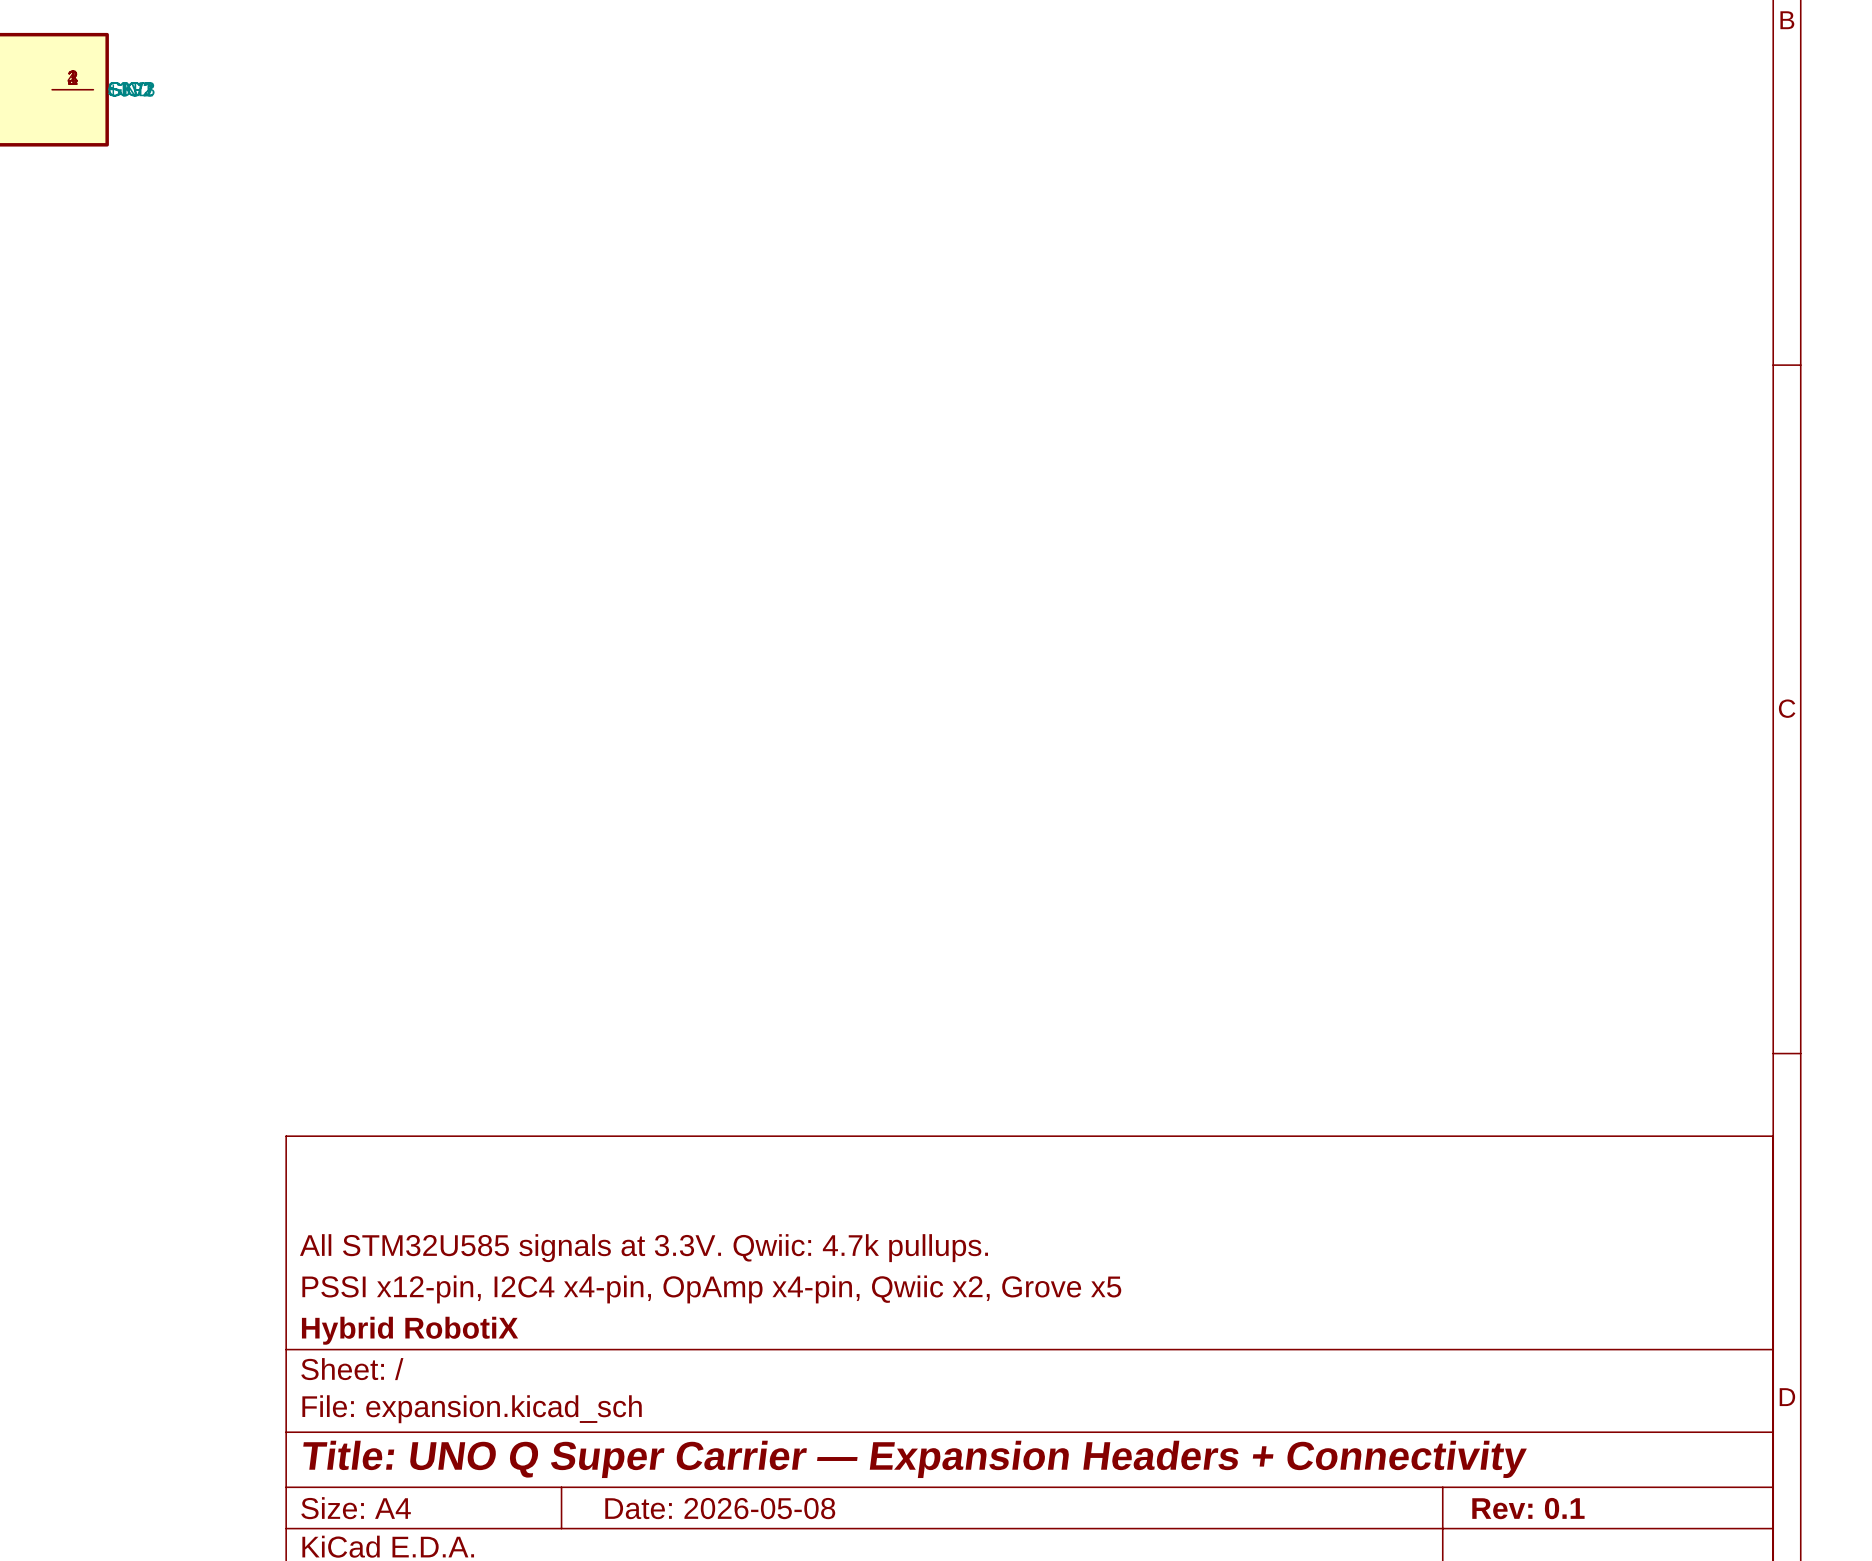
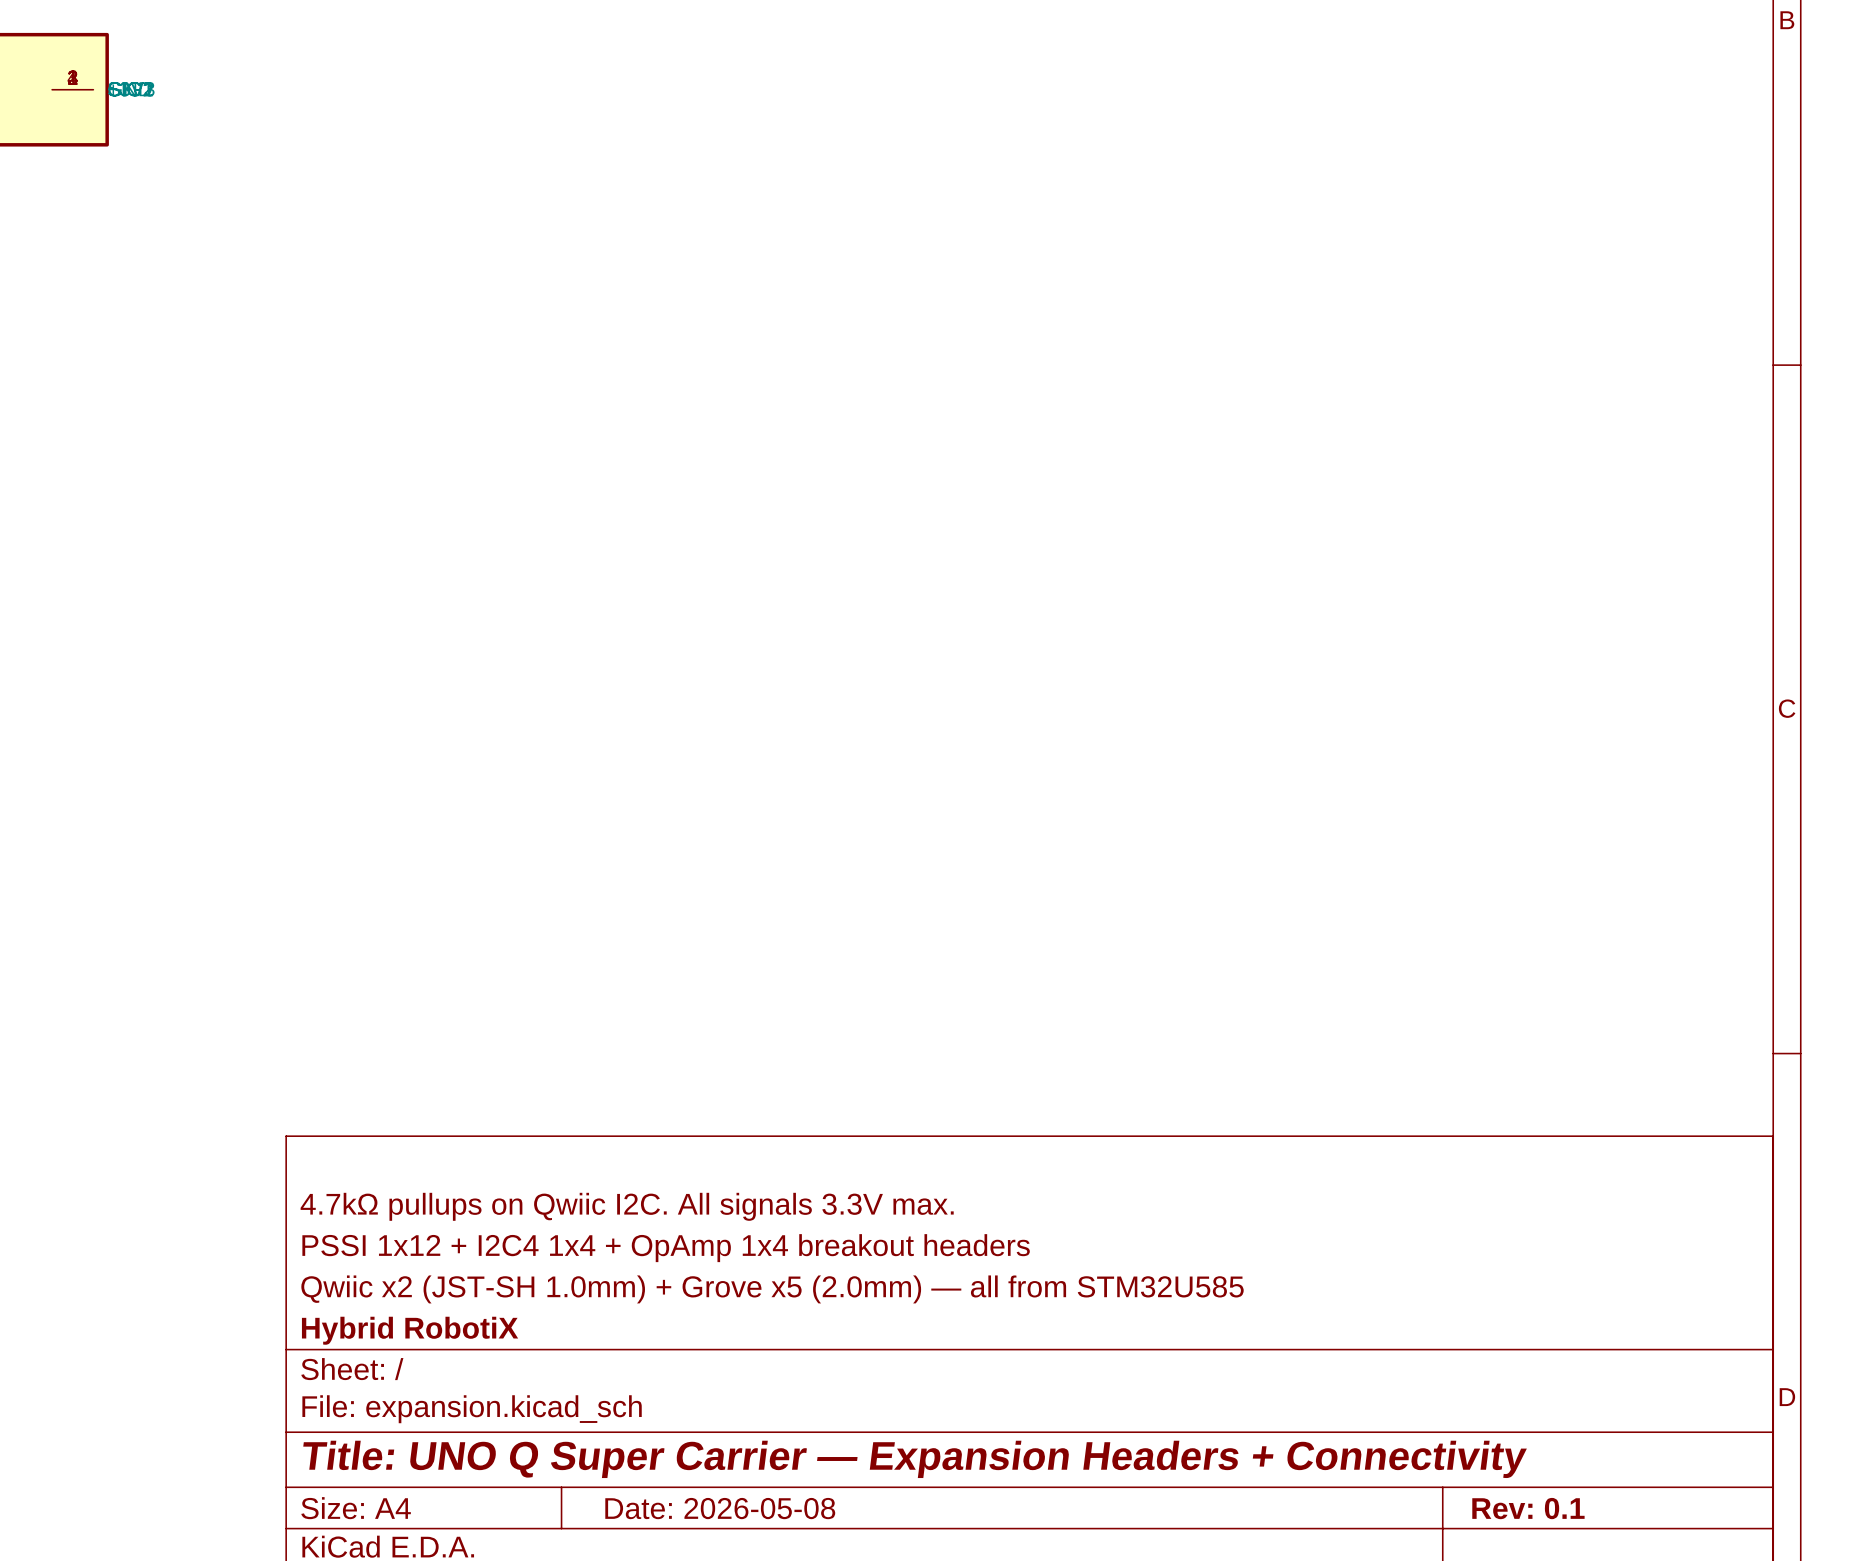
title block: none -> 4.7kΩ pullups on Qwiic I2C. All signals 3.3V max. (627, 1206)
title block: All STM32U585 signals at 3.3V. Qwiic: 4.7k pullups. (643, 1248) -> PSSI 1x12 + I2C4 1x4 + OpAmp 1x4 breakout headers (666, 1248)
title block: PSSI x12-pin, I2C4 x4-pin, OpAmp x4-pin, Qwiic x2, Grove x5 (711, 1289) -> Qwiic x2 (JST-SH 1.0mm) + Grove x5 (2.0mm) — all from STM32U585 (772, 1289)

